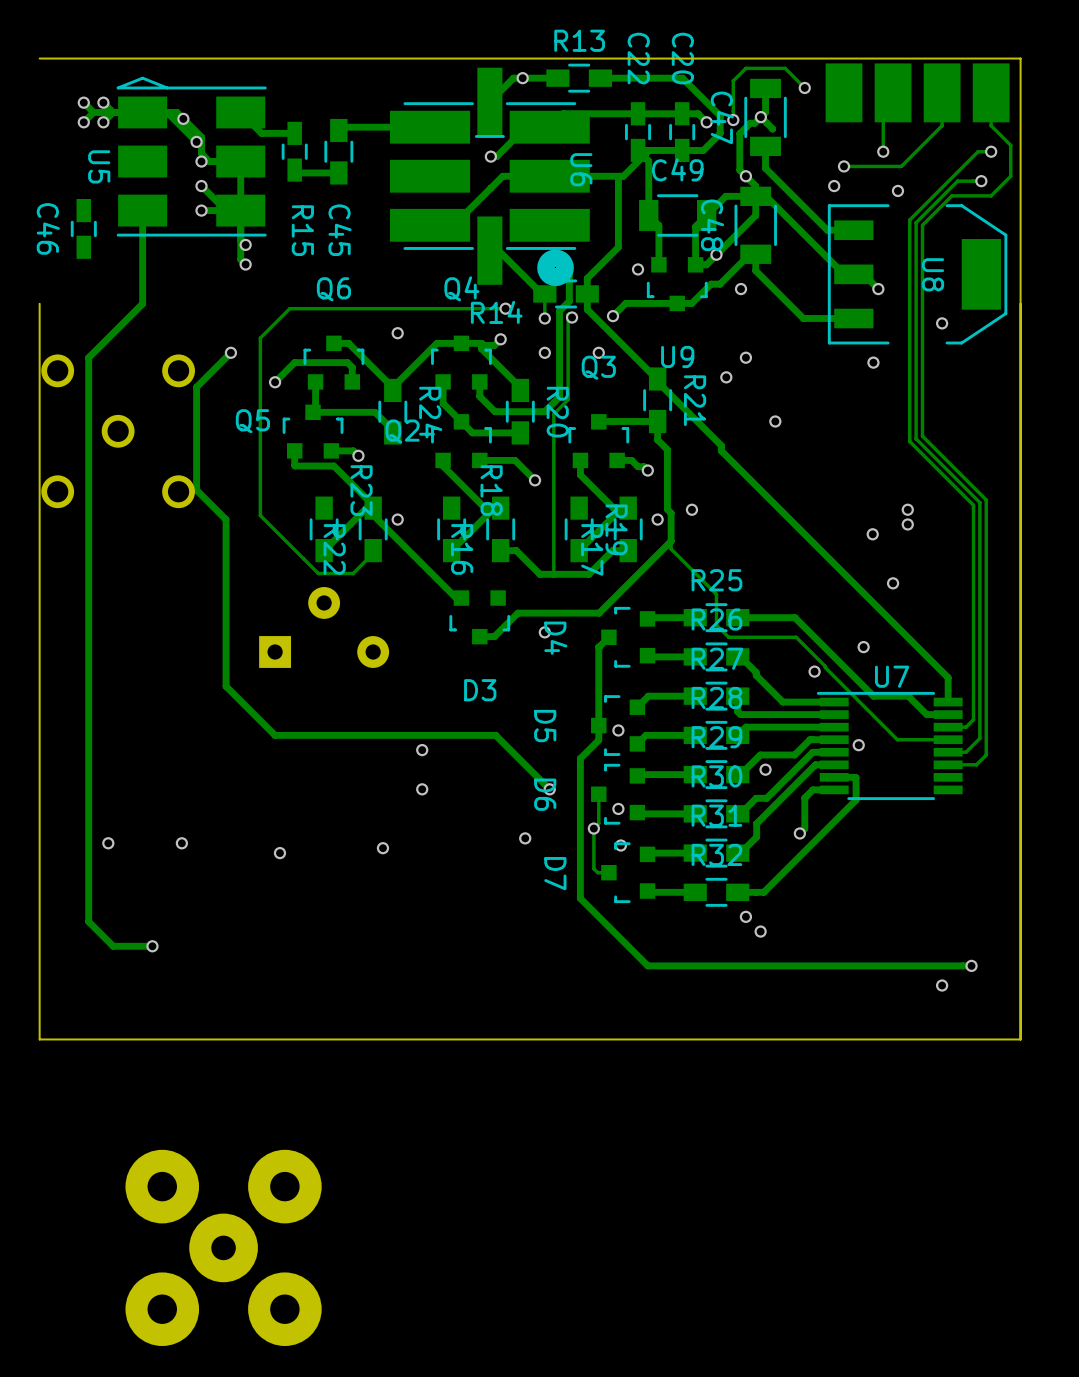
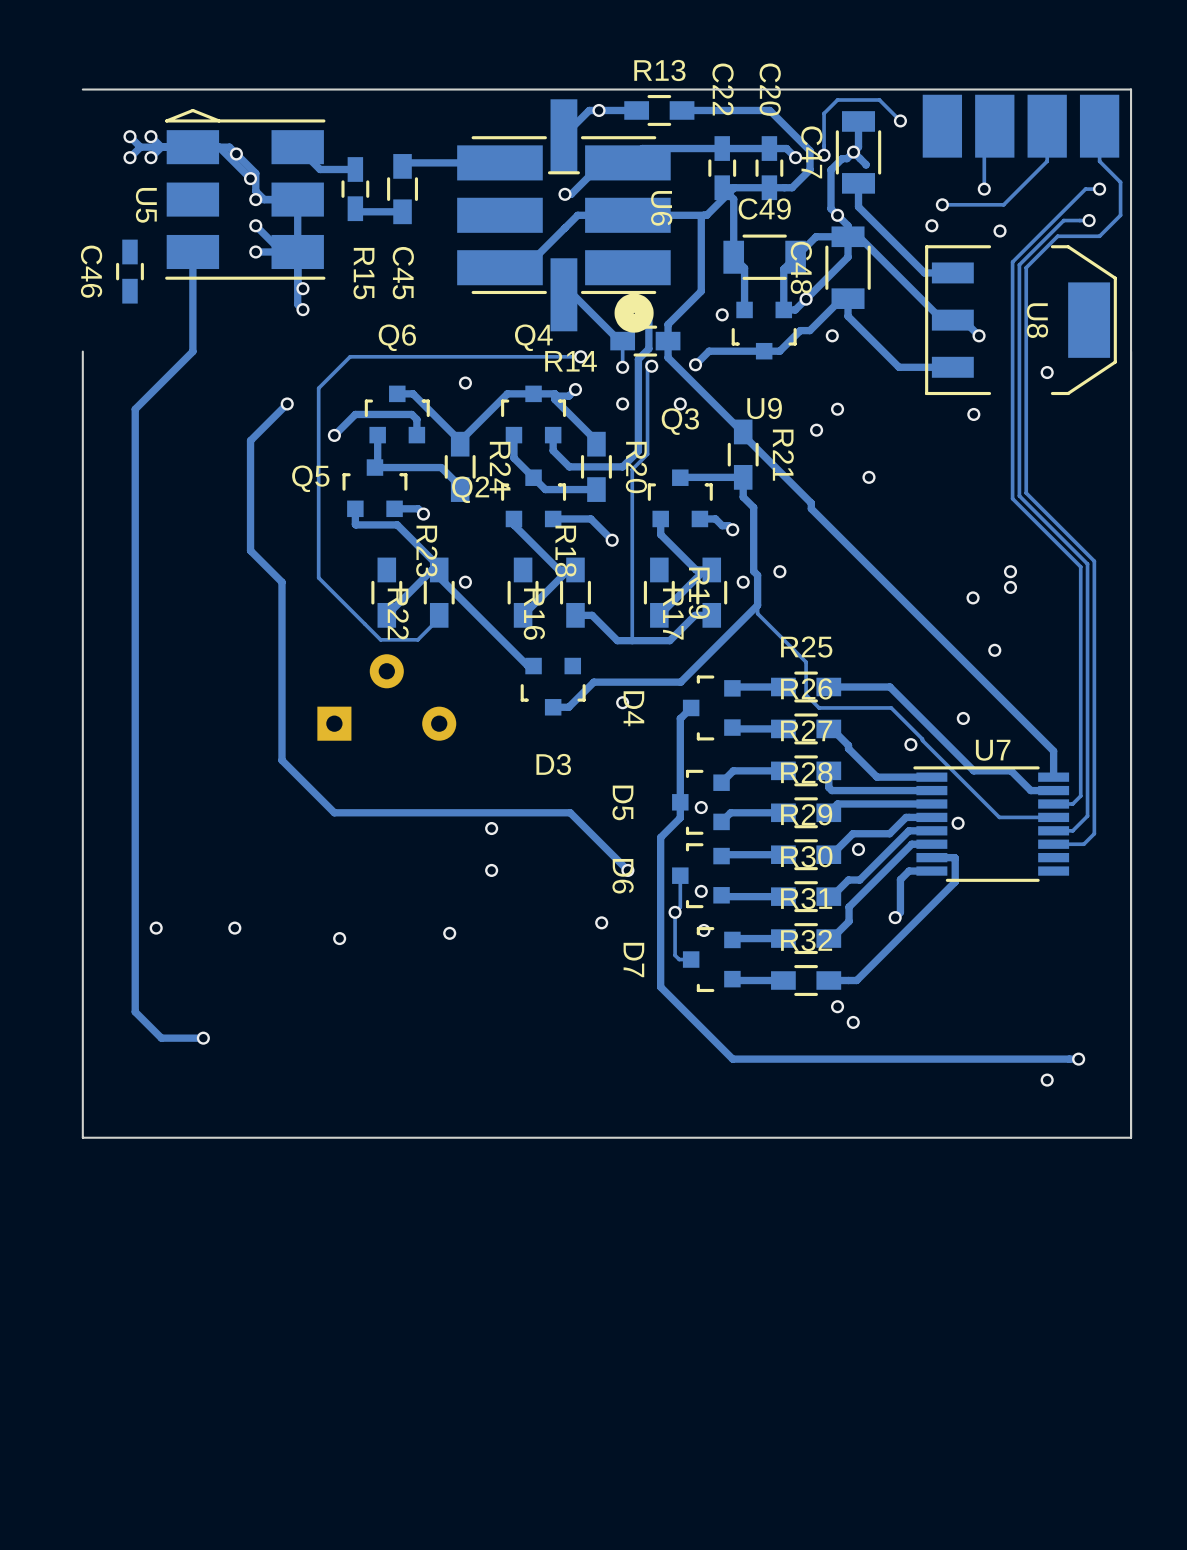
part: (118, 431) -> none
part: (223, 1247) -> none

